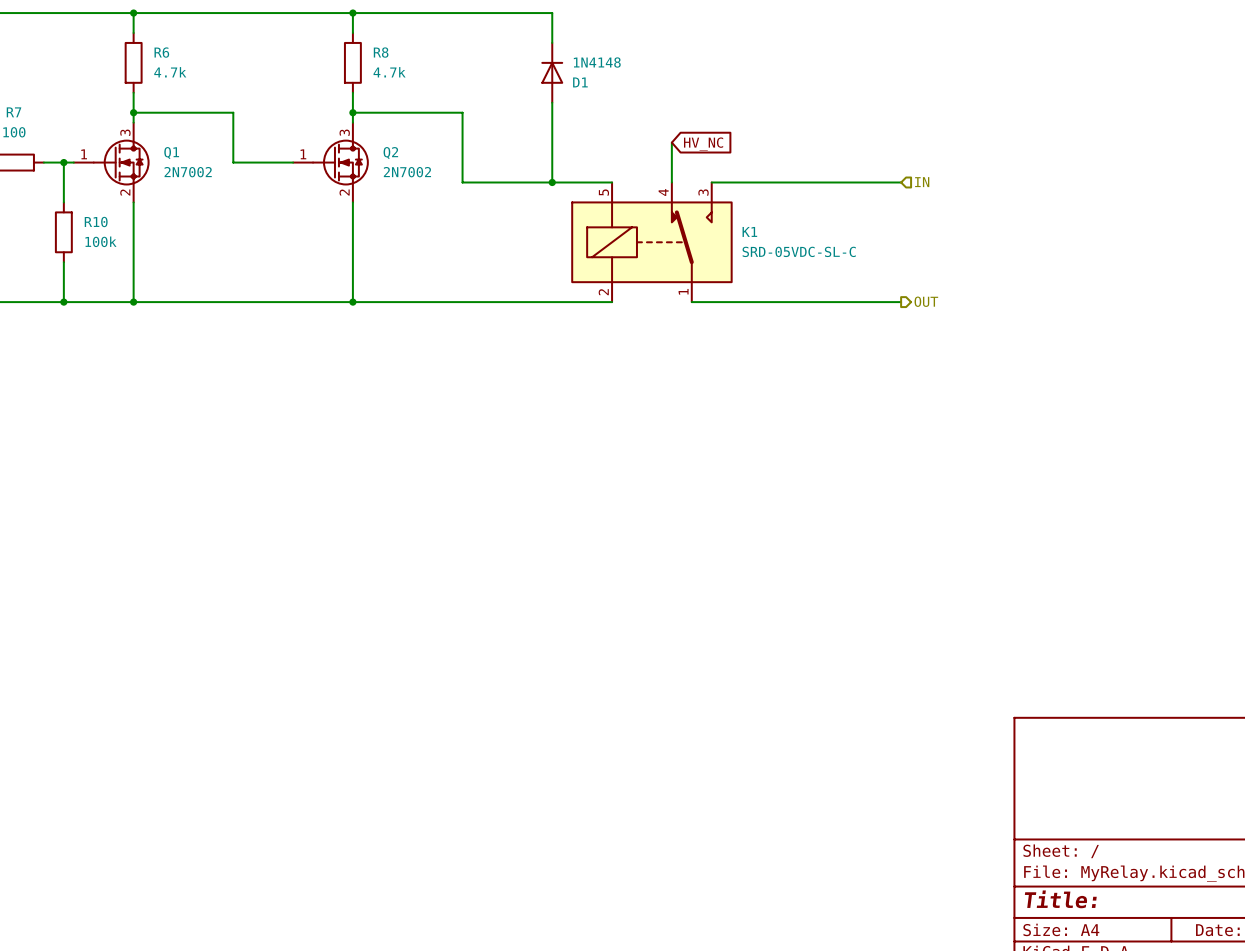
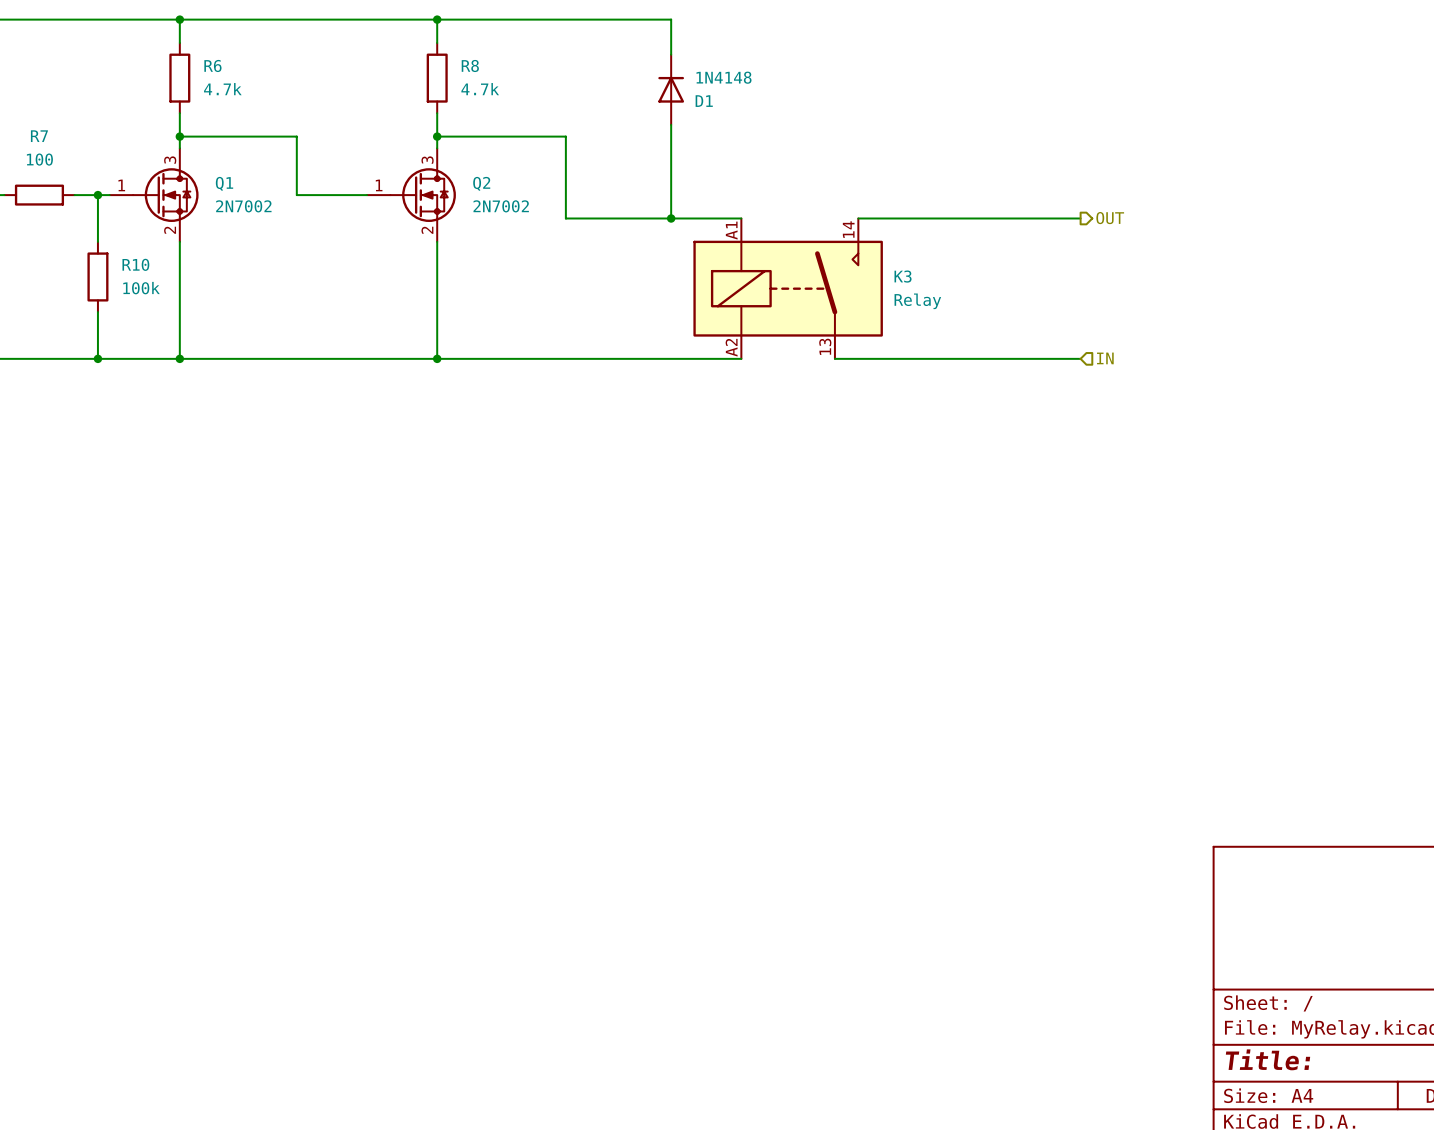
wire: (671, 142) (671, 182) -> none
global label: HV_NC (703, 144) -> none
hierarchical label shape: input (922, 182) -> output (1110, 218)
hierarchical label: IN (922, 182) -> OUT (1110, 218)
K1: SRD-05VDC-SL-C (651, 242) -> none
K3: none -> Relay (788, 288)
hierarchical label shape: output (926, 301) -> input (1105, 358)
hierarchical label: OUT (926, 301) -> IN (1105, 358)

